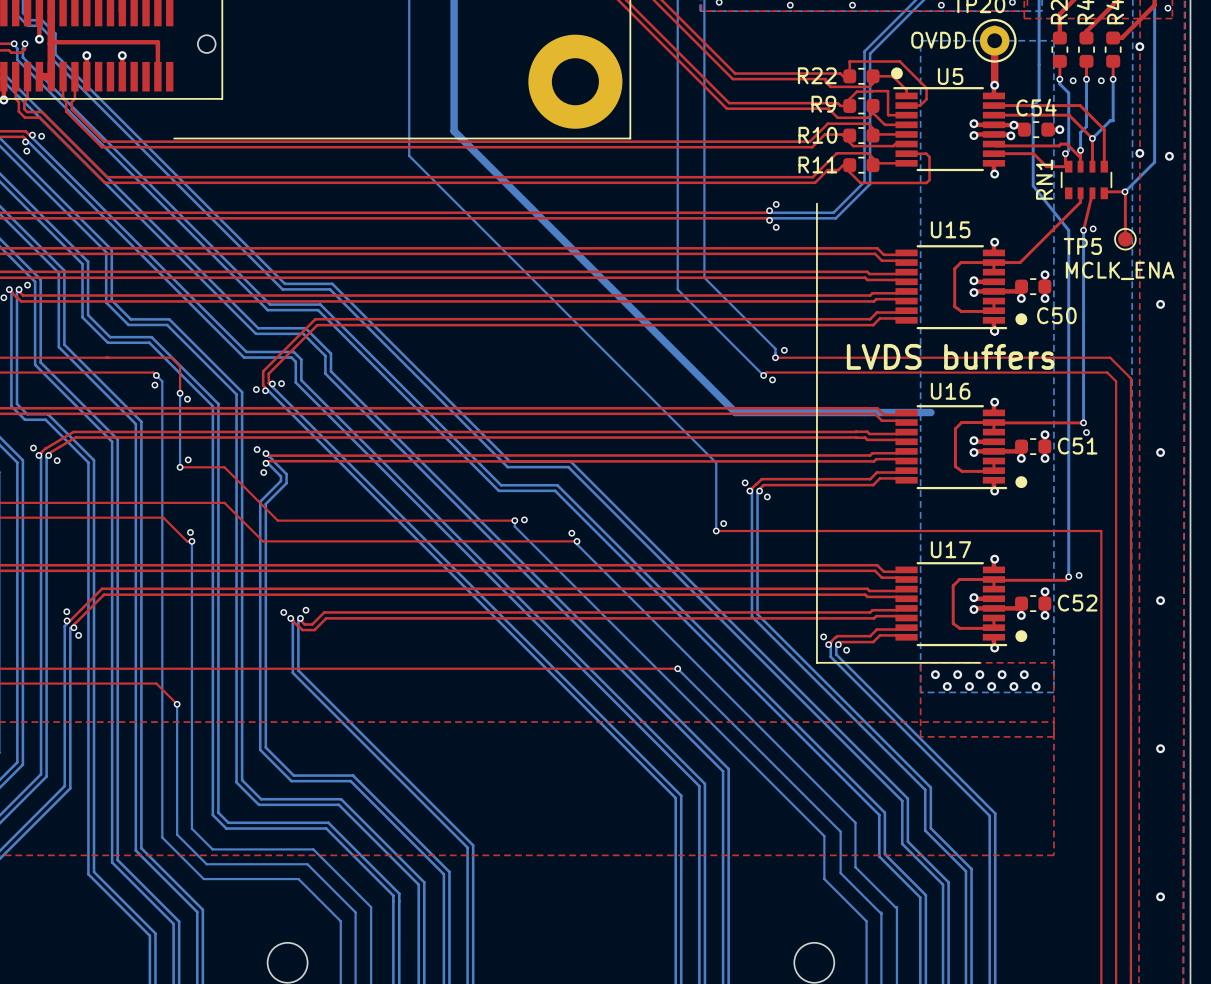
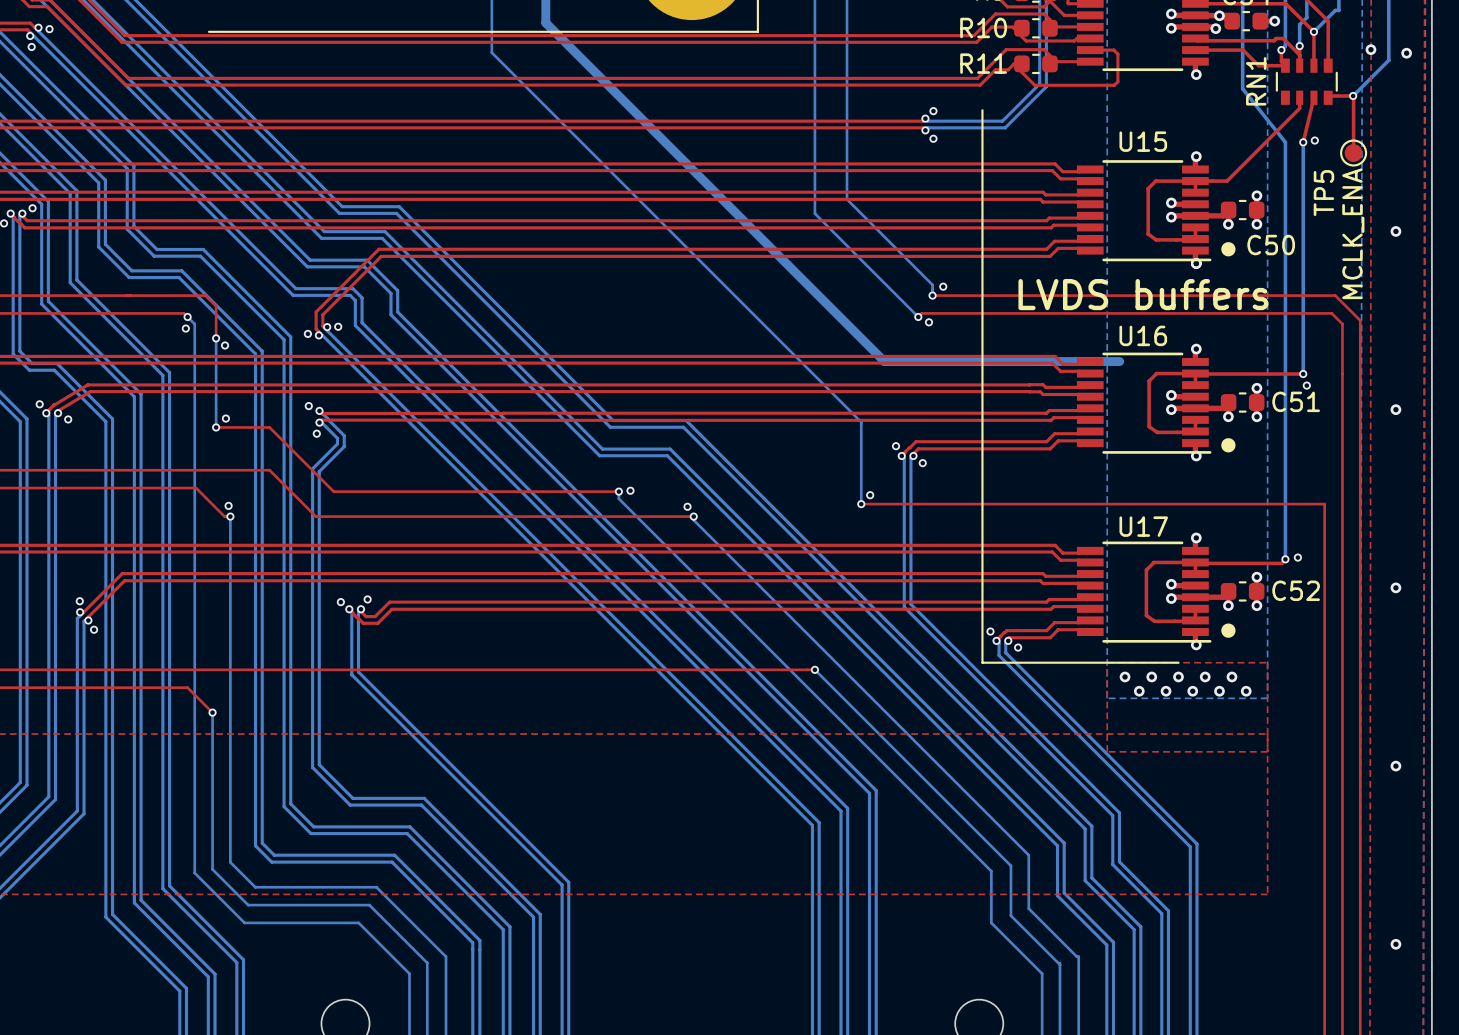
TP5 name rotation: 0° (1082, 246) -> 90° counterclockwise (1323, 193)
TP5 value rotation: 0° (1120, 270) -> 90° counterclockwise (1353, 233)

